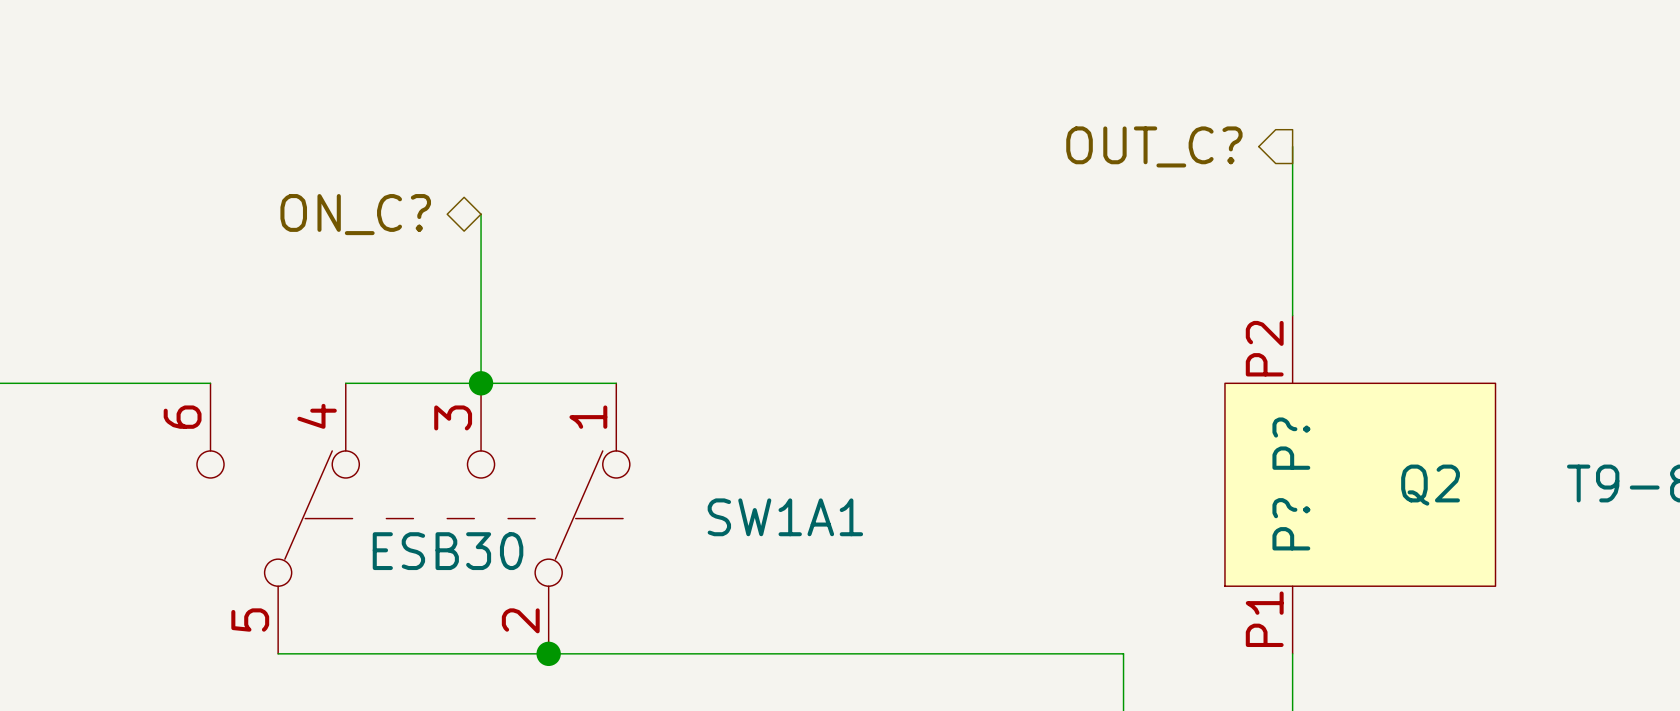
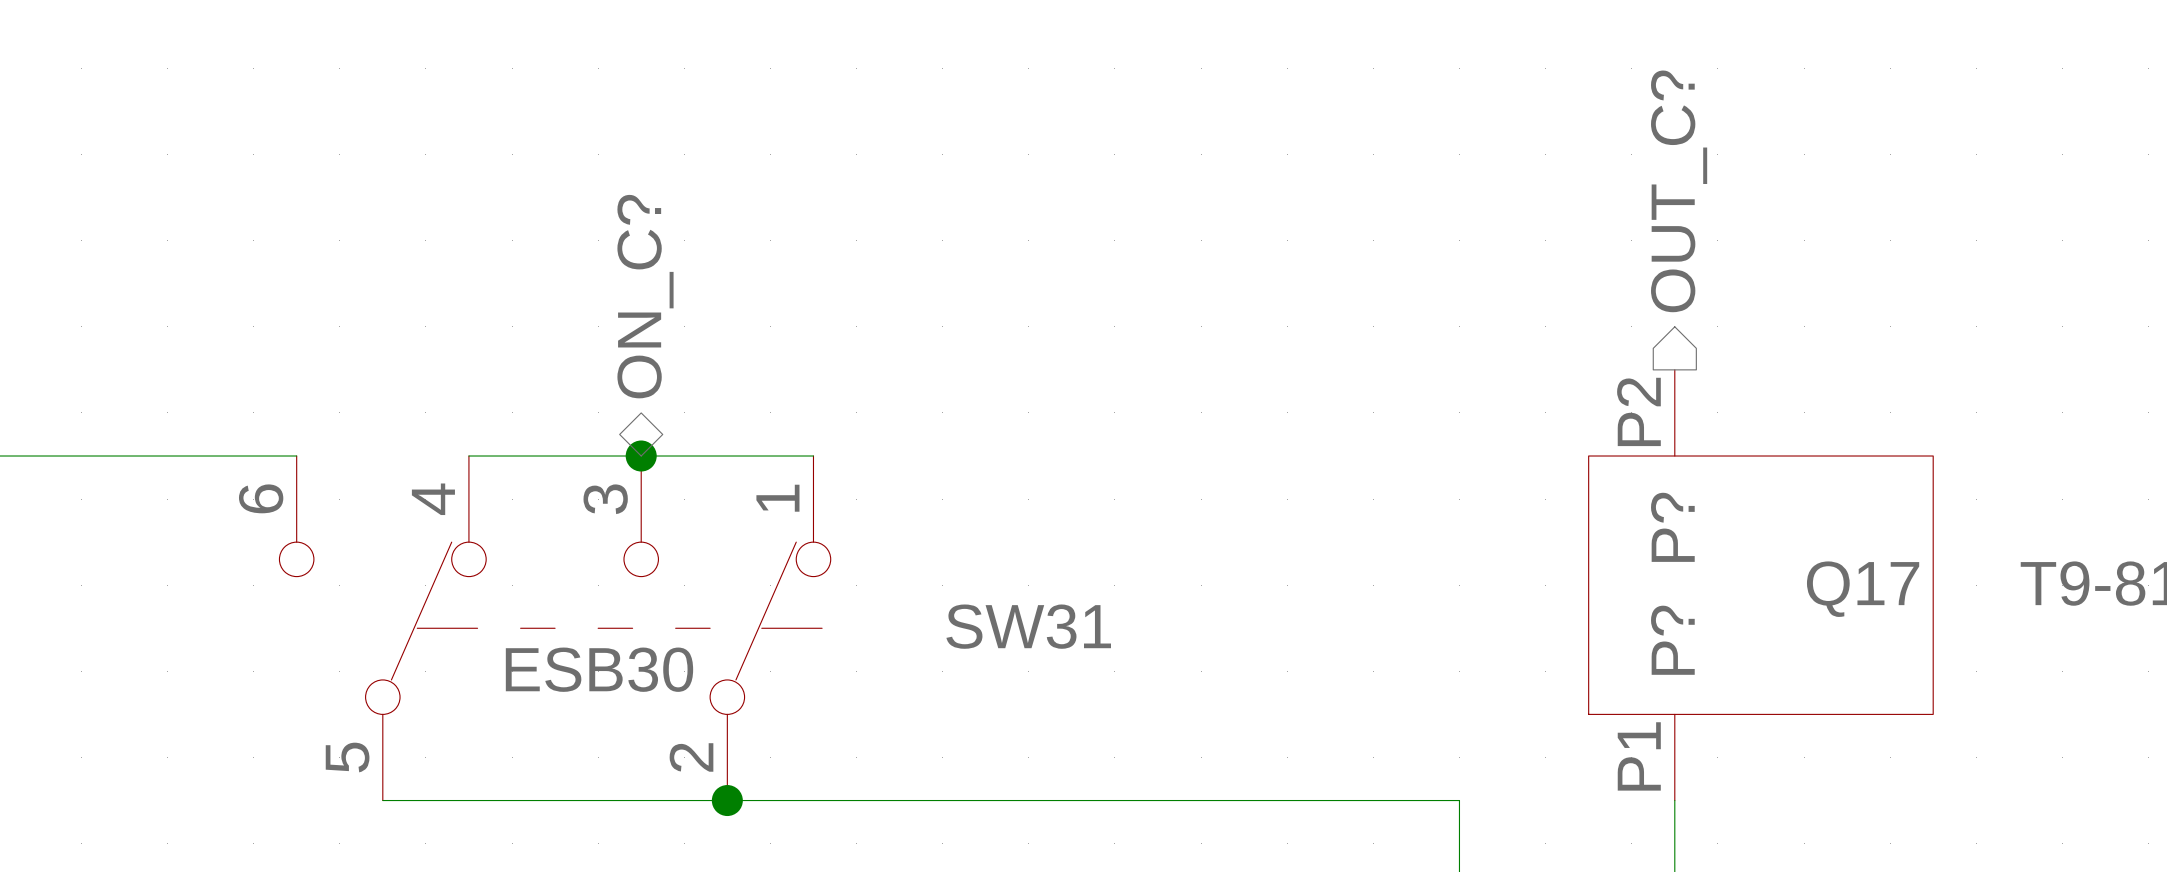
hierarchical label rotation: 0° (1154, 146) -> 90° clockwise (1679, 191)
wire: (1292, 146) (1292, 315) -> none
hierarchical label rotation: 0° (355, 214) -> 90° clockwise (645, 296)
wire: (481, 214) (481, 383) -> none
Q2 name: Q2 (1430, 485) -> Q17 (1863, 589)
SW1A1 name: SW1A1 (785, 517) -> SW31 (1028, 626)

